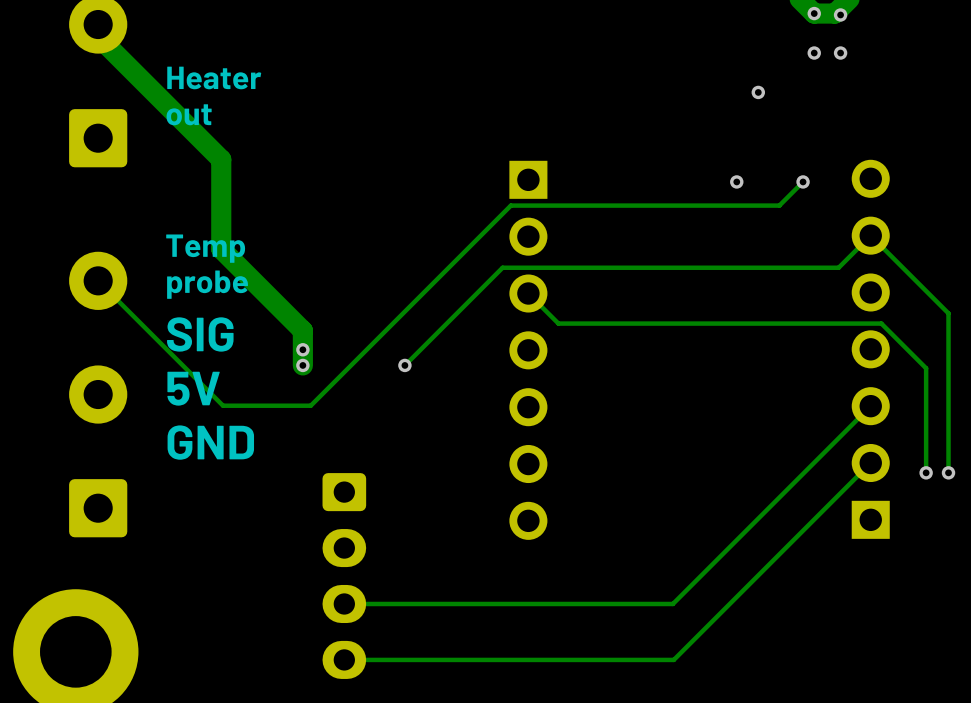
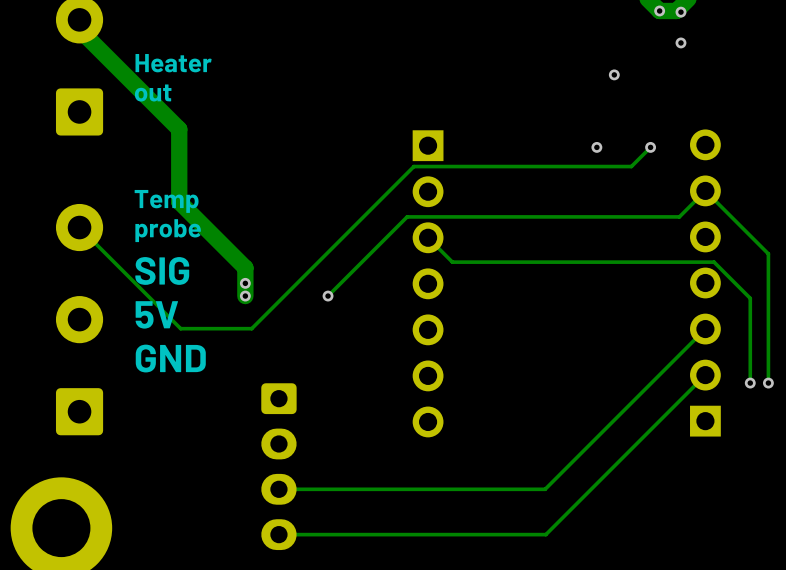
via: (814, 53) -> none

